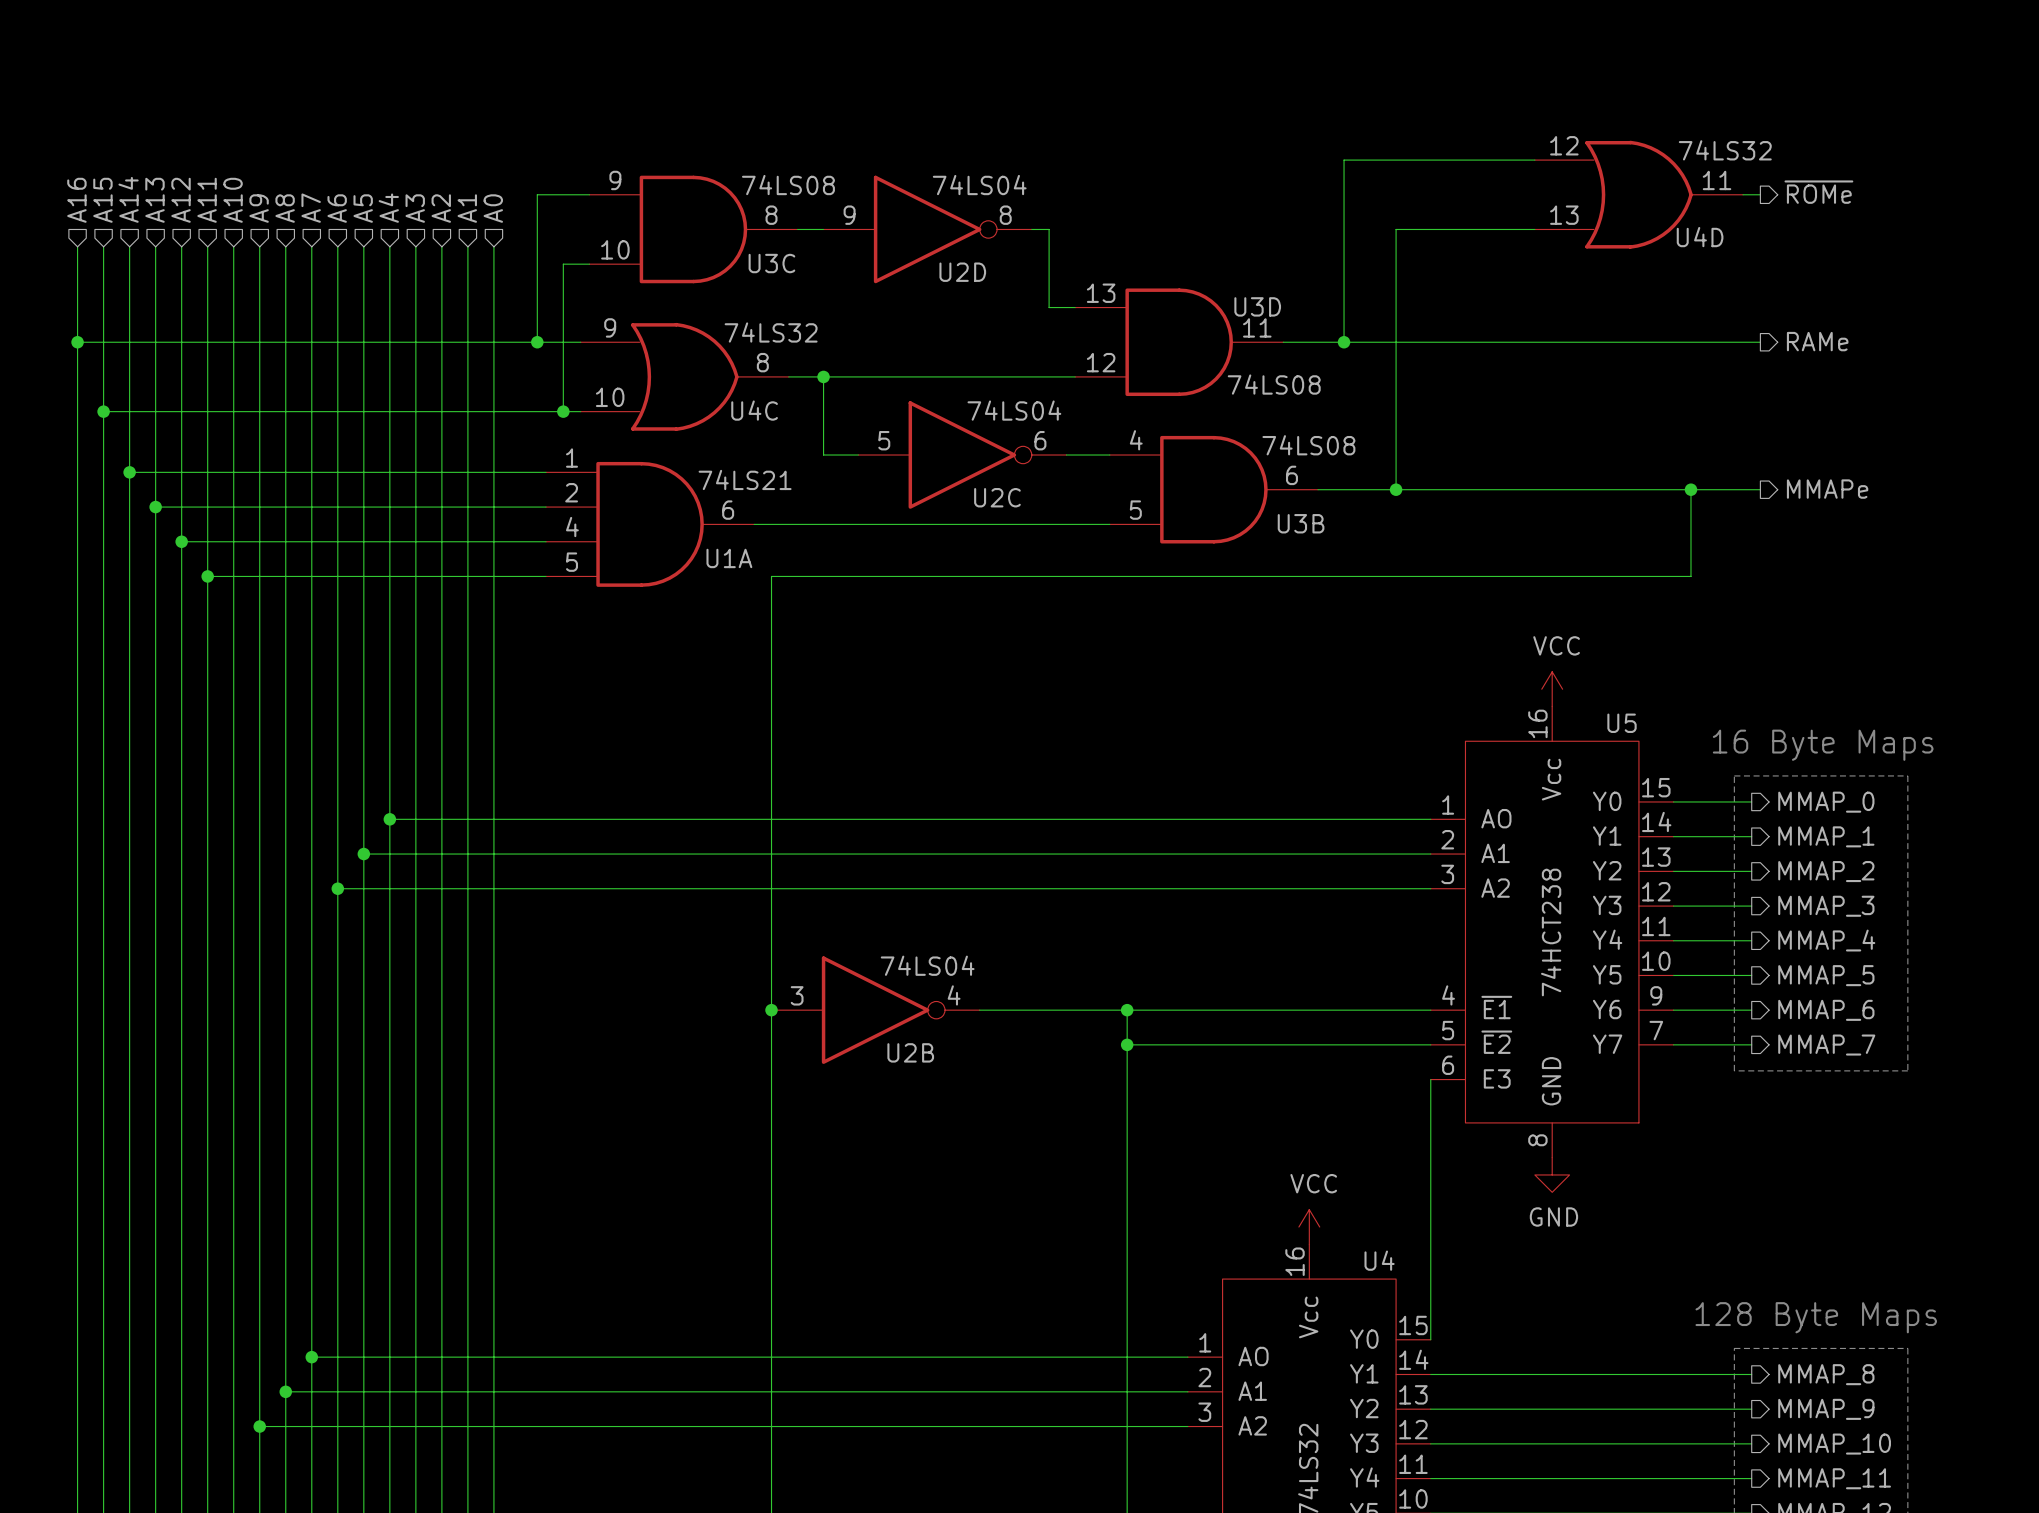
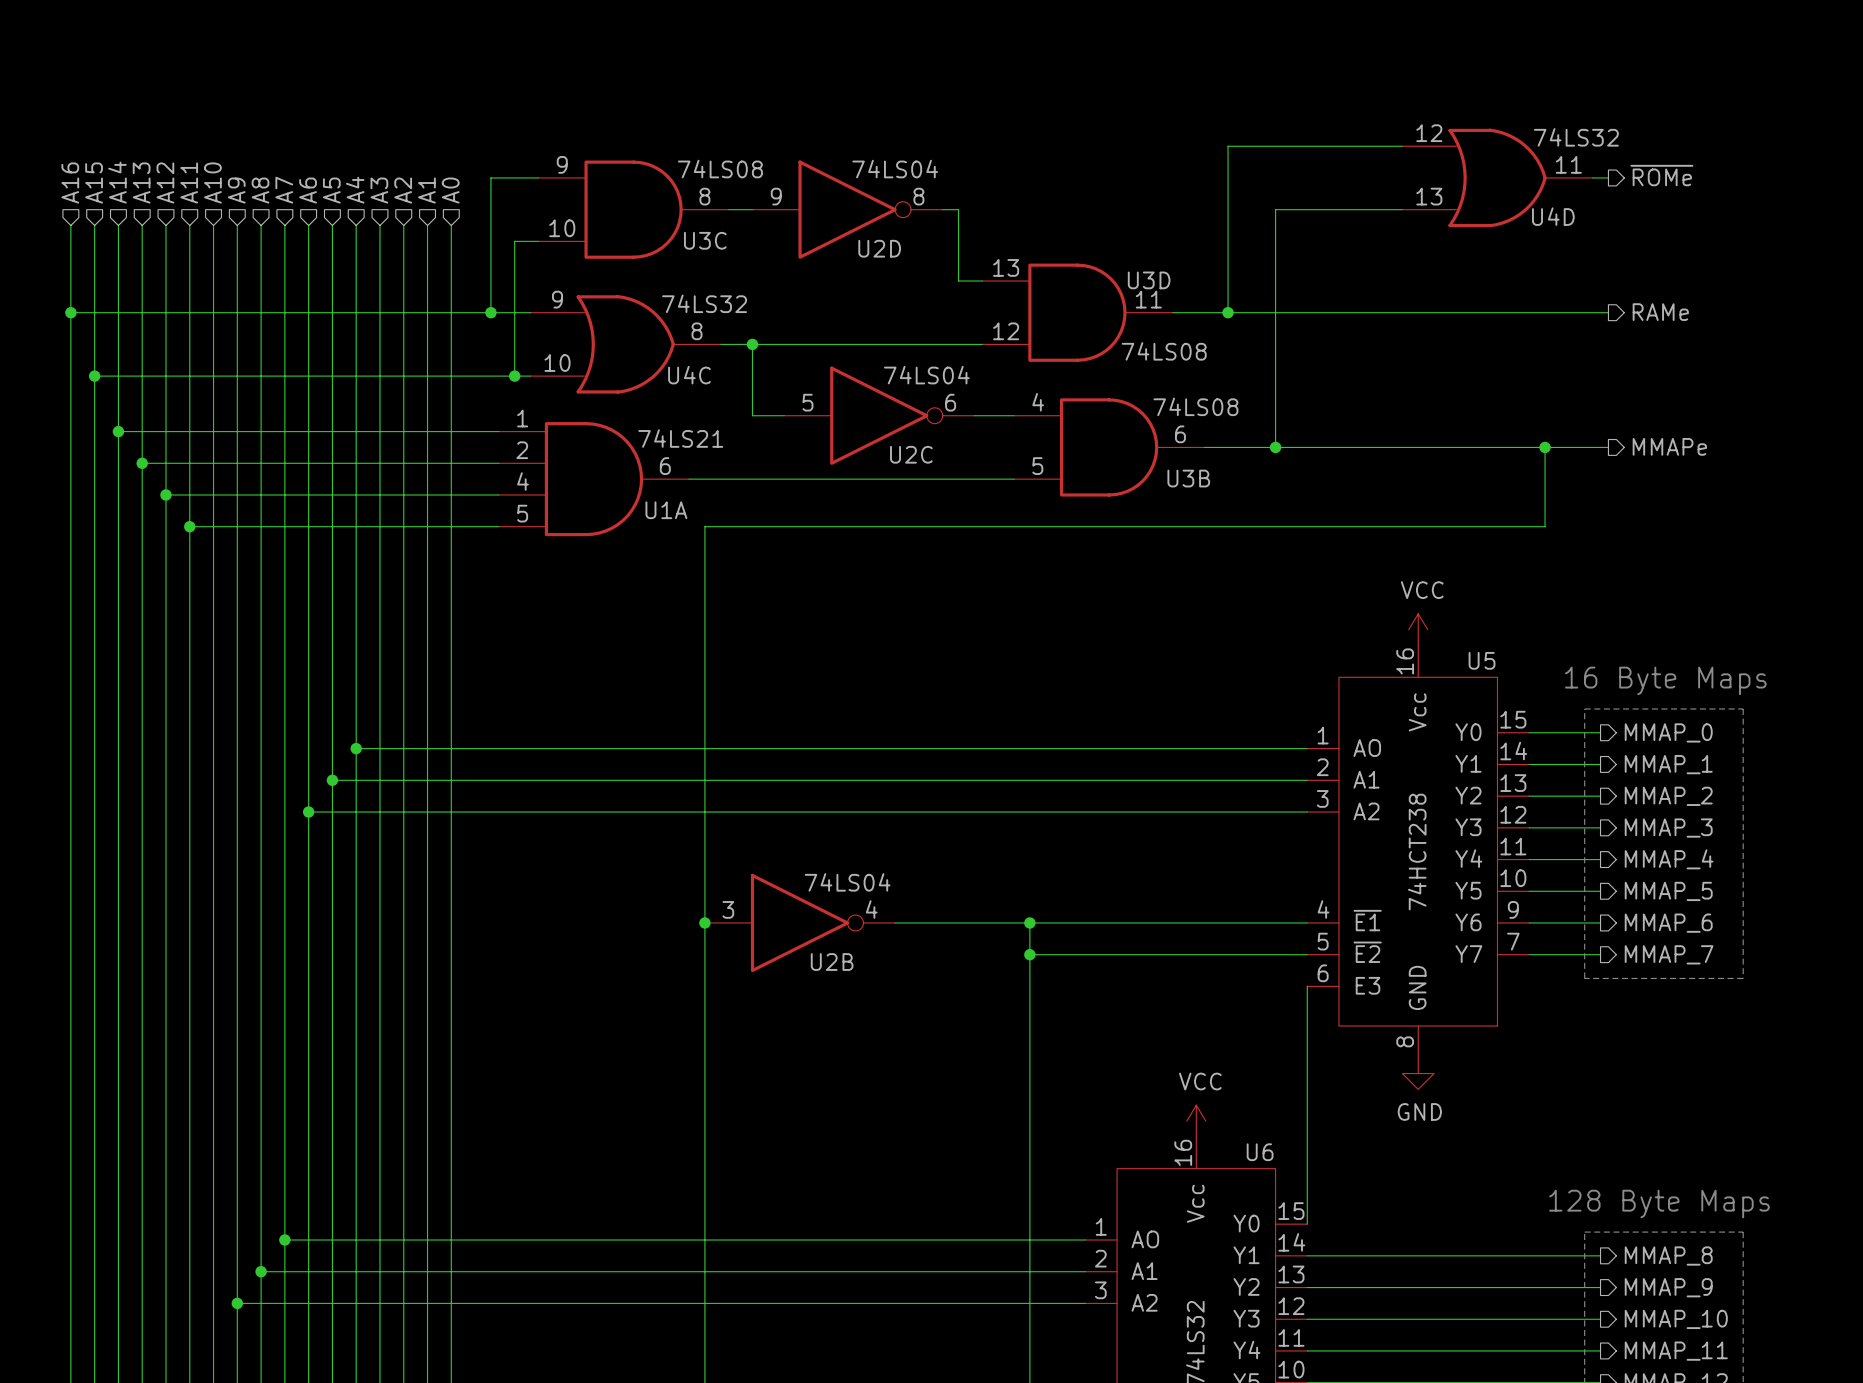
U4 name: U4 (1379, 1260) -> U6 (1260, 1152)

